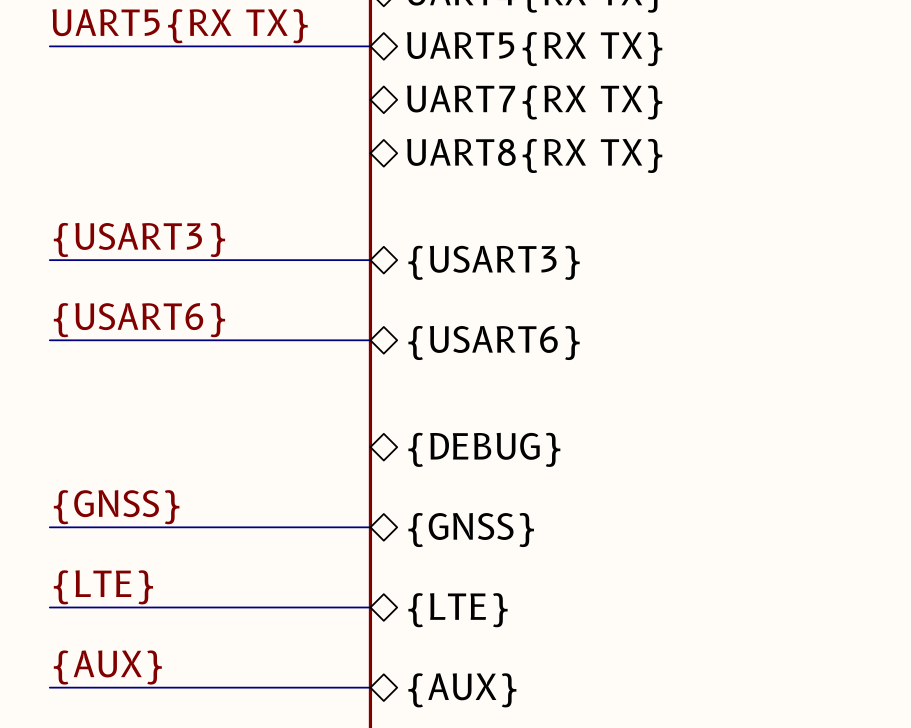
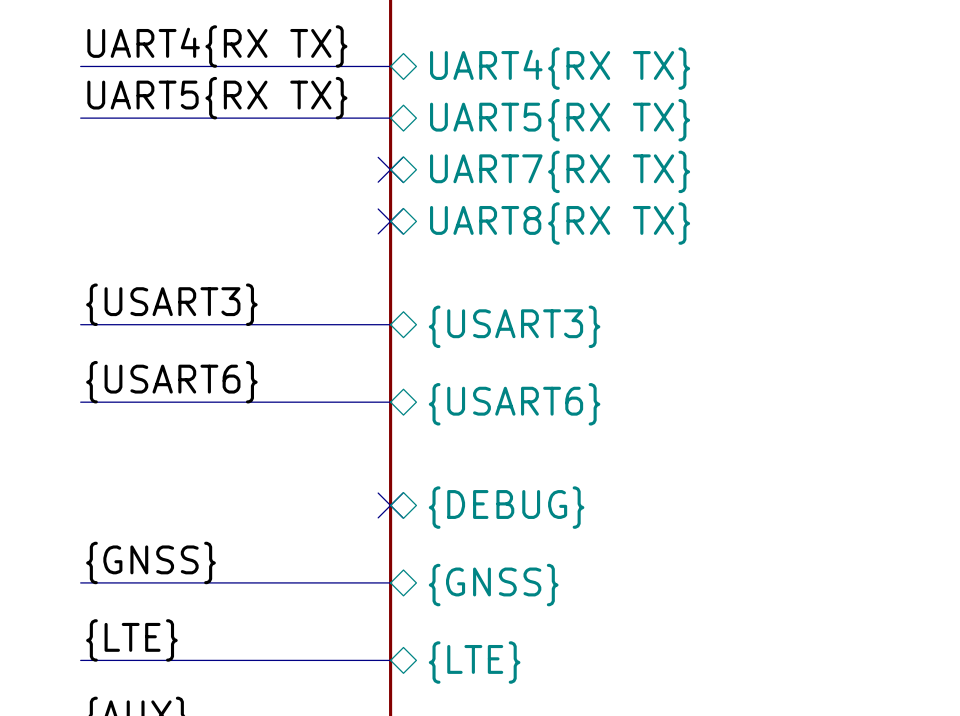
no-connect mark: none -> (390, 169)
no-connect mark: none -> (390, 221)
no-connect mark: none -> (390, 505)

